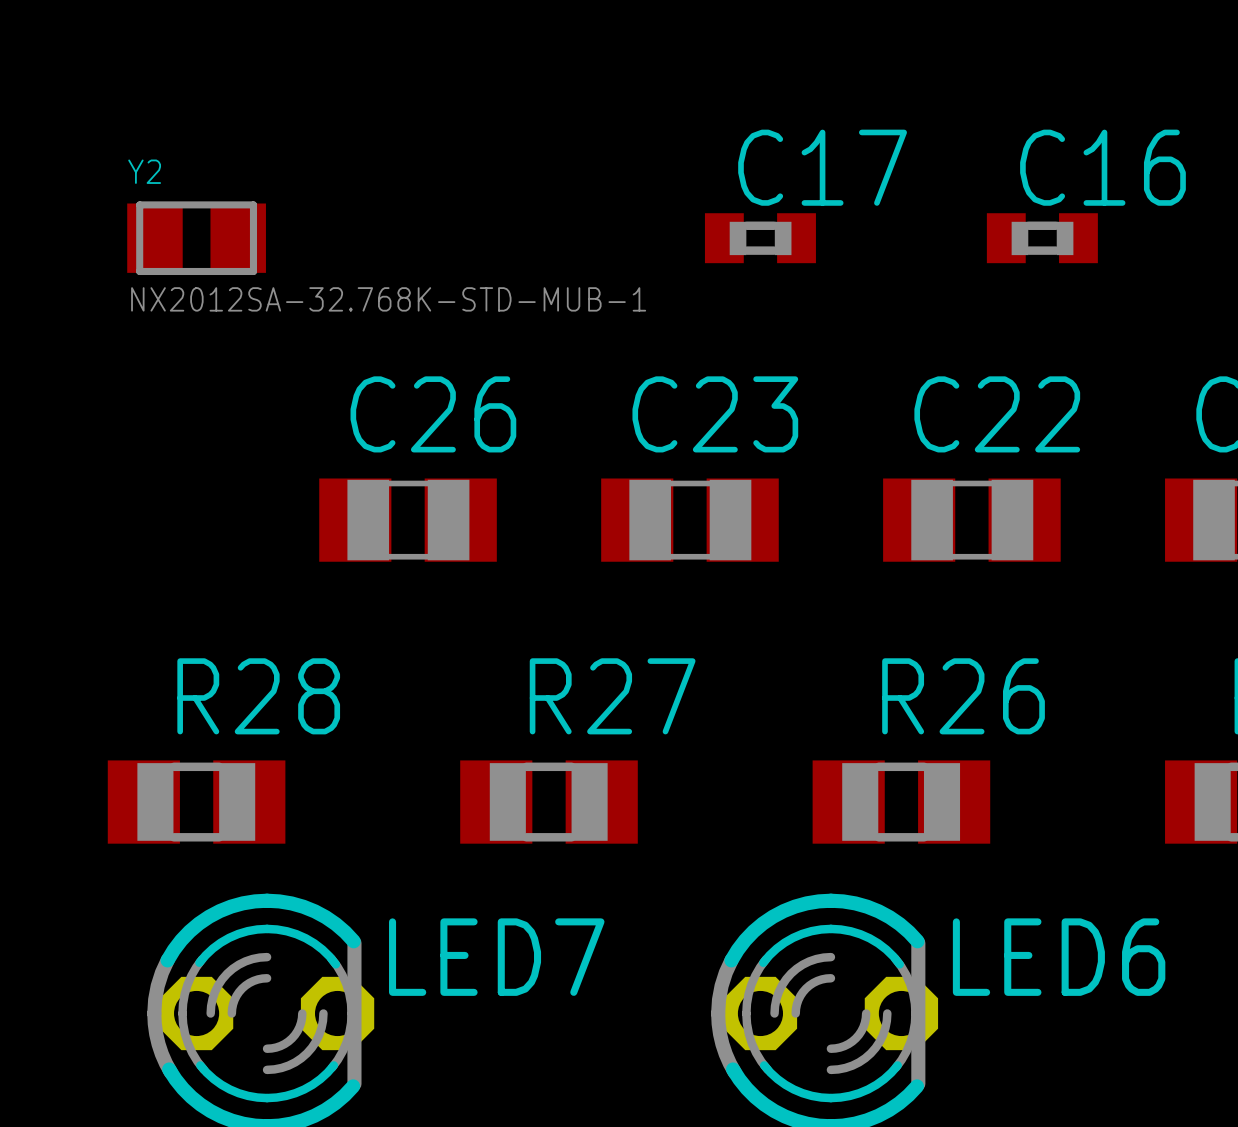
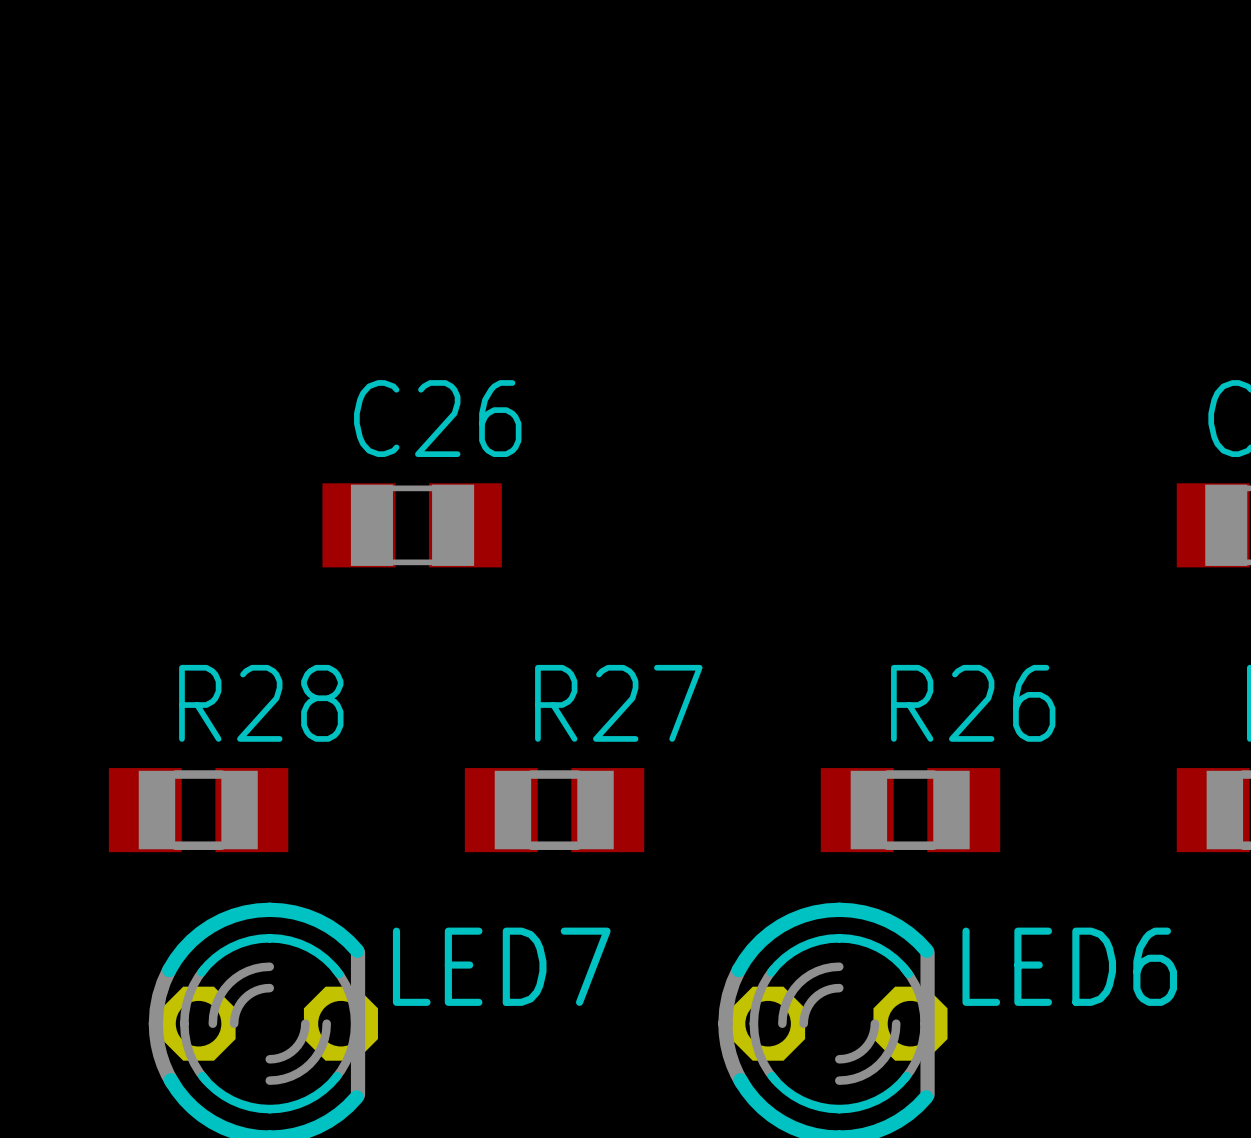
Y2: NX2012SA-32.768K-STD-MUB-1 (196, 238) -> none
C17: (760, 238) -> none
C16: (1042, 238) -> none
C23: (689, 520) -> none
C22: (971, 520) -> none

